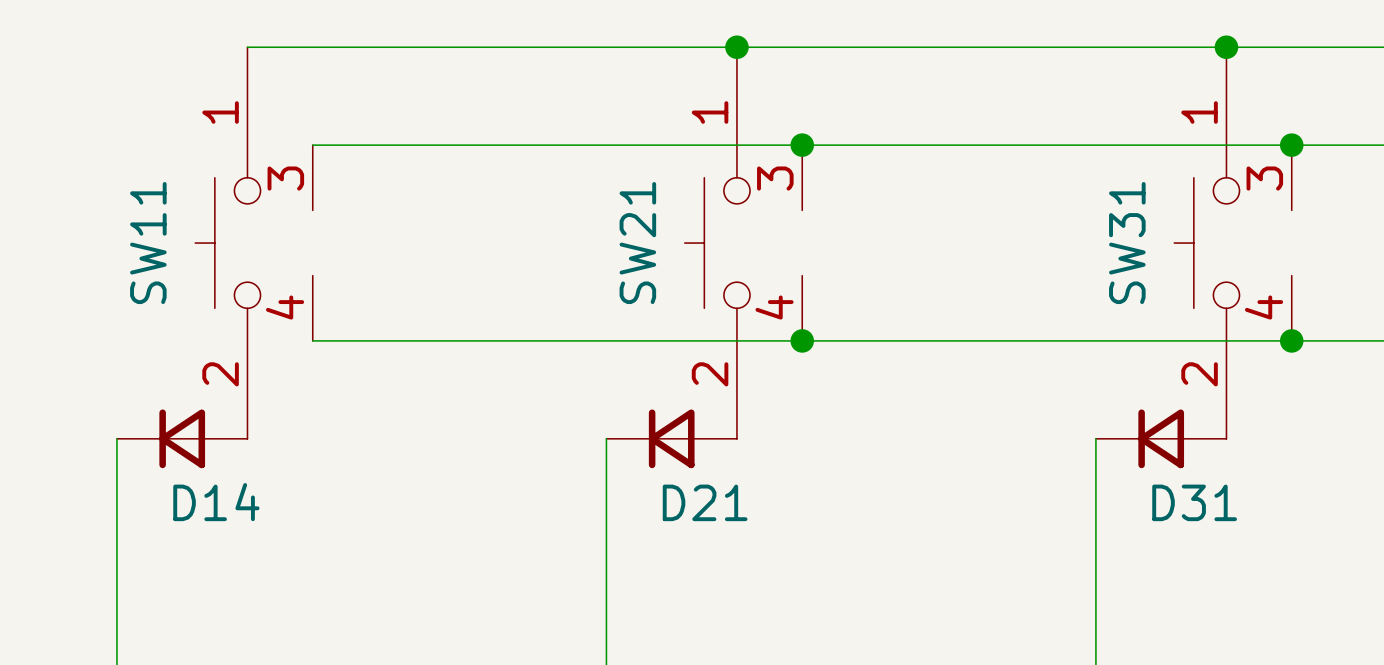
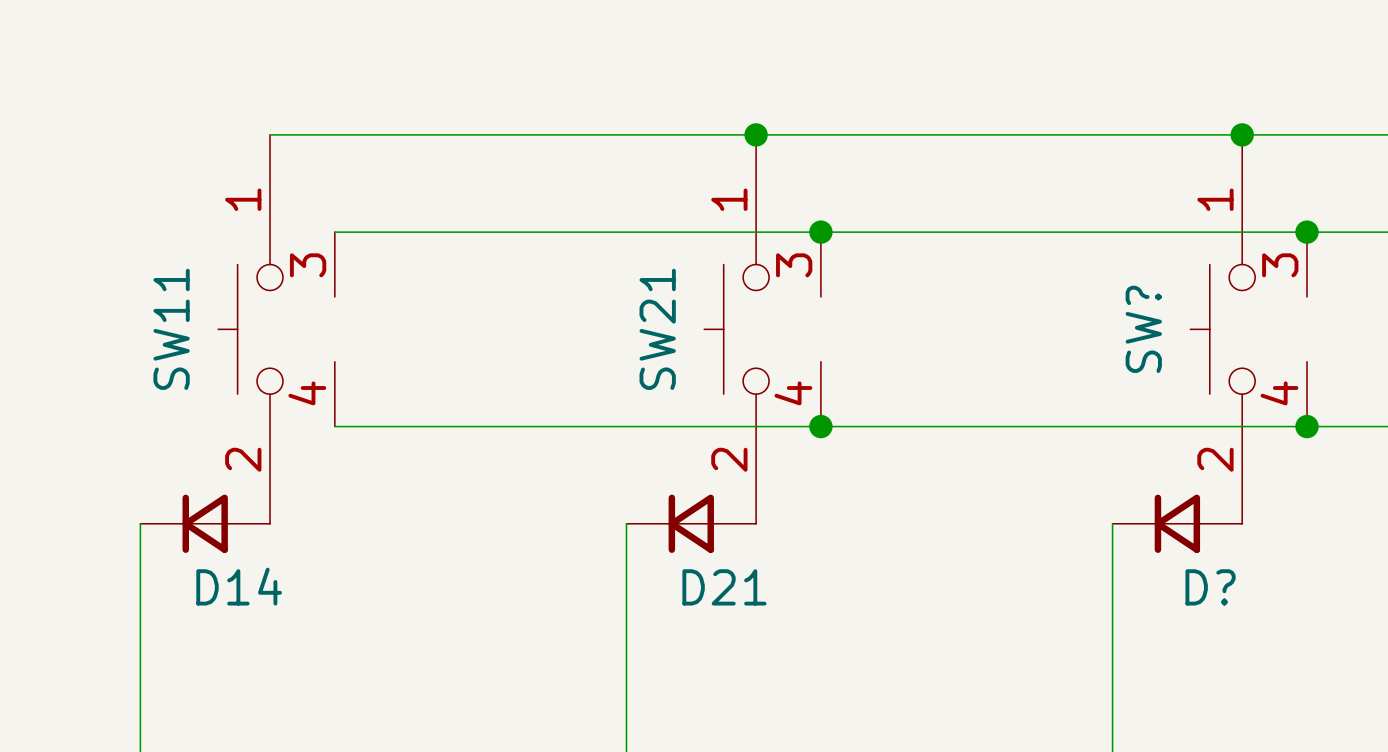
SW31 name: SW31 (1127, 243) -> SW? (1143, 329)
D31 name: D31 (1194, 502) -> D? (1210, 587)

